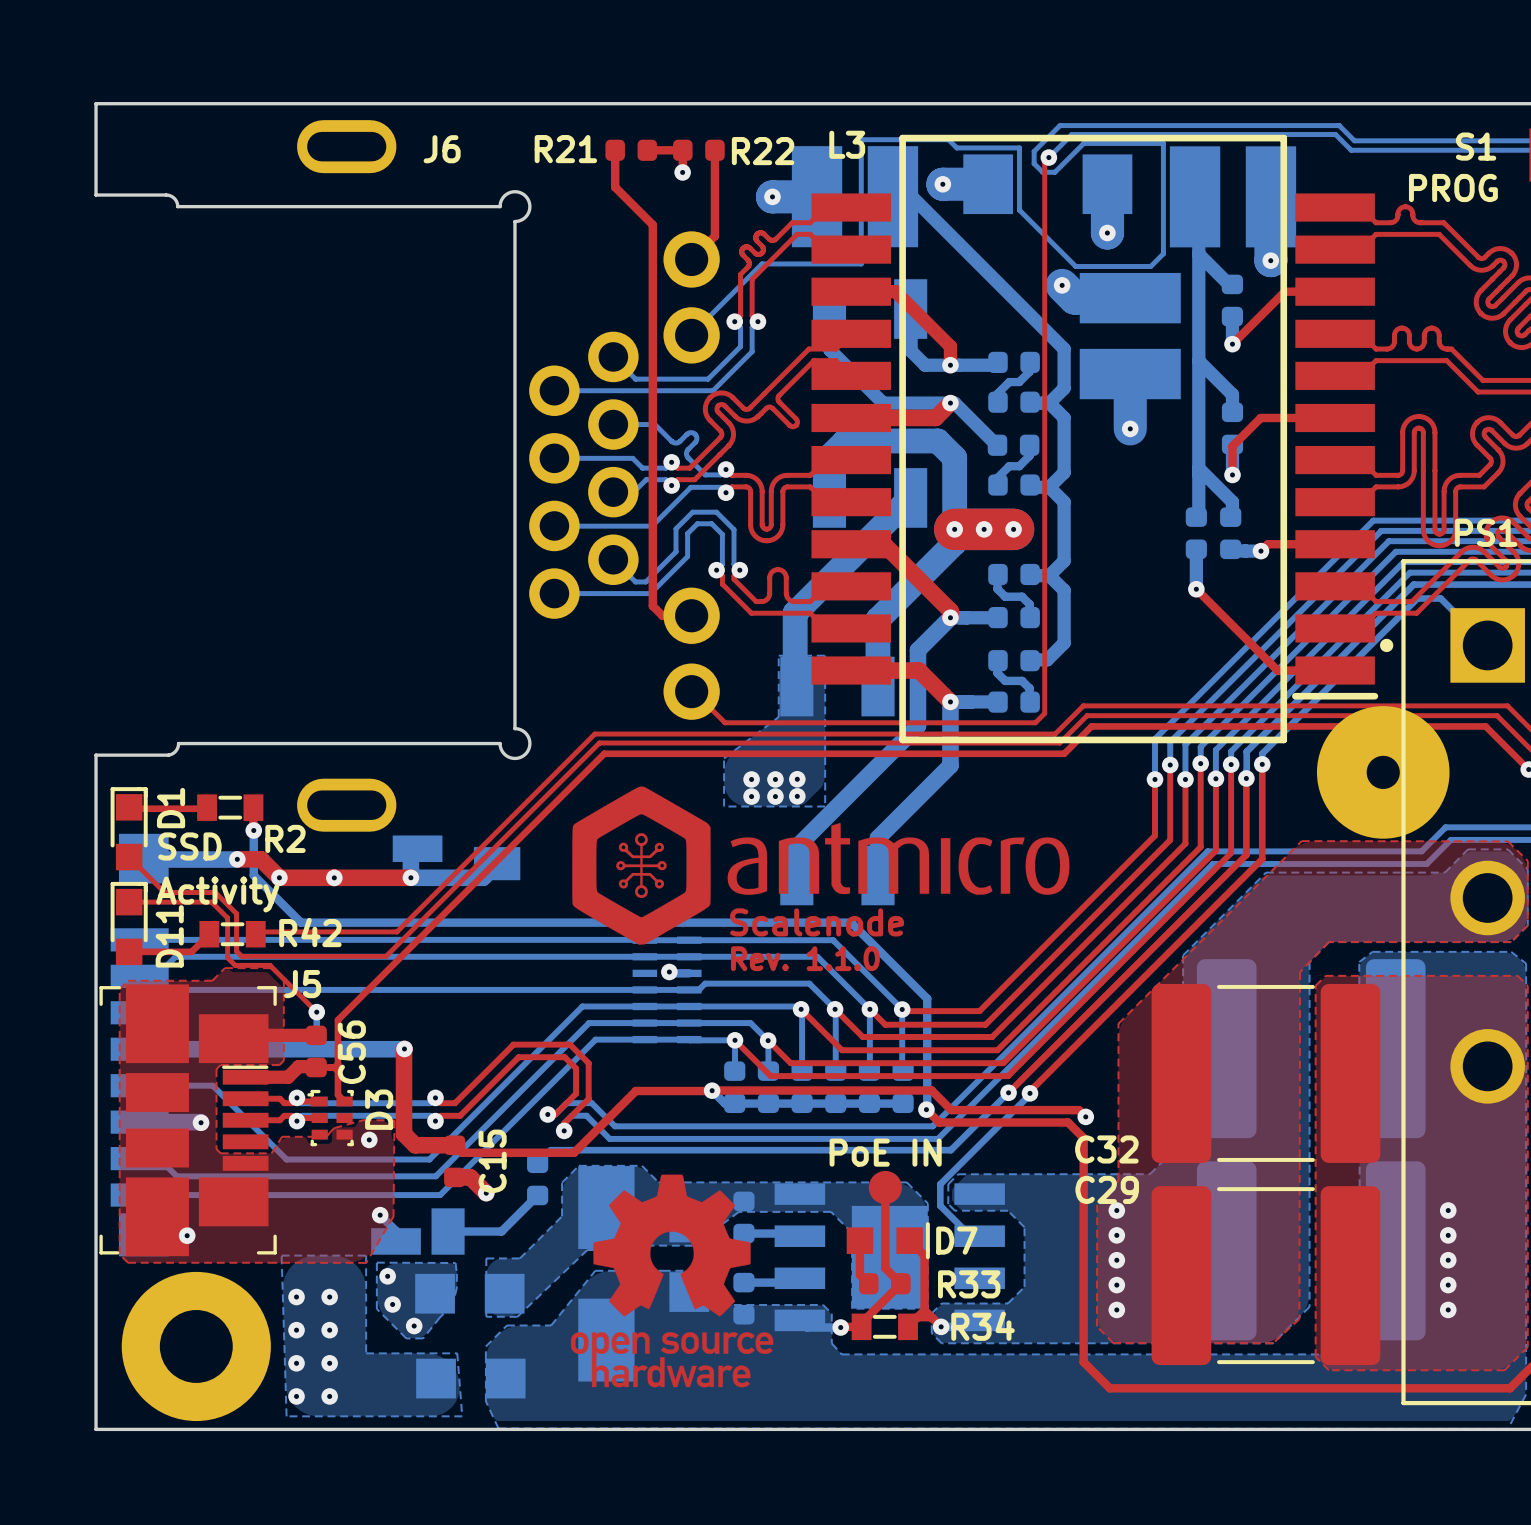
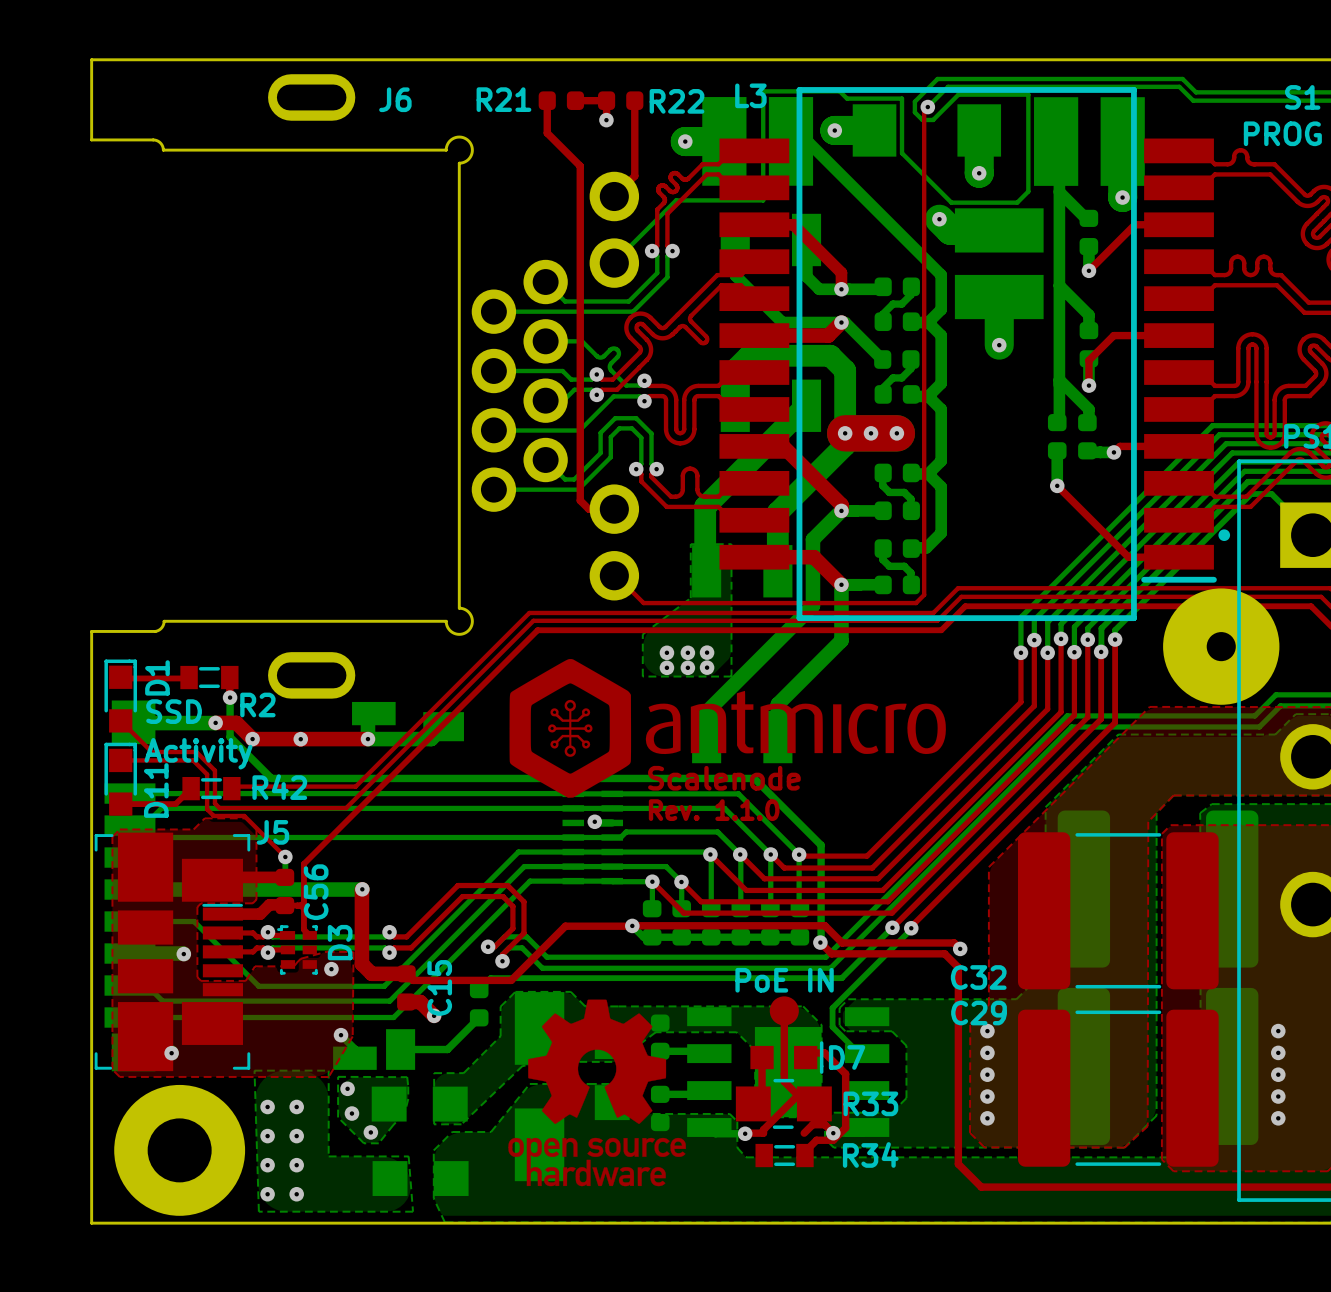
top track: none -> (805, 1053) (824, 1053) (845, 1073) (845, 1127) (833, 1140) (816, 1140) (804, 1151) (804, 1155)
top track: (909, 1240) (924, 1255) (924, 1310) -> none
R33 footprint: [858, 1273, 911, 1295] -> [735, 1078, 832, 1129]
R34 position: (884, 1326) -> (784, 1155)

